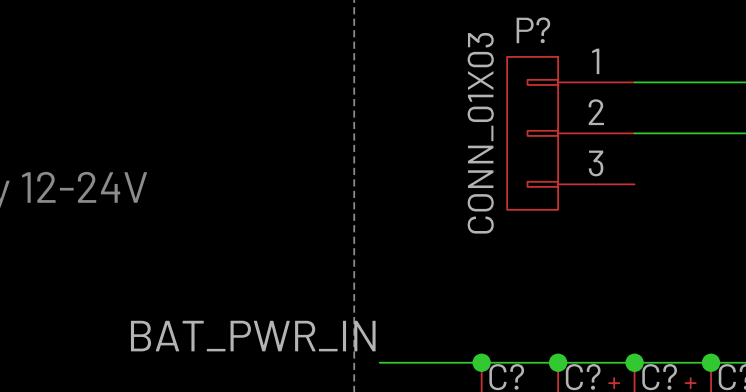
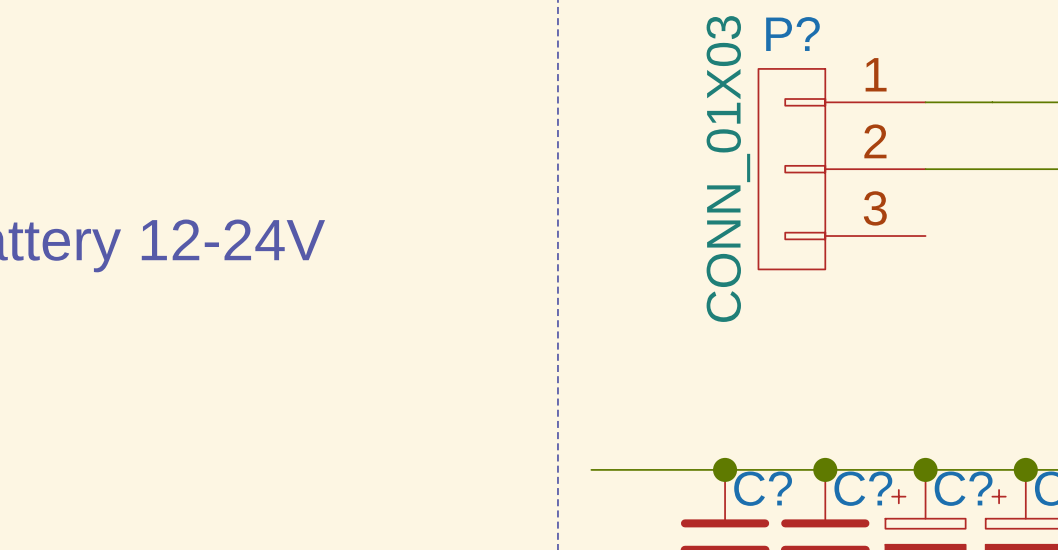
label: BAT_PWR_IN (253, 336) -> none

